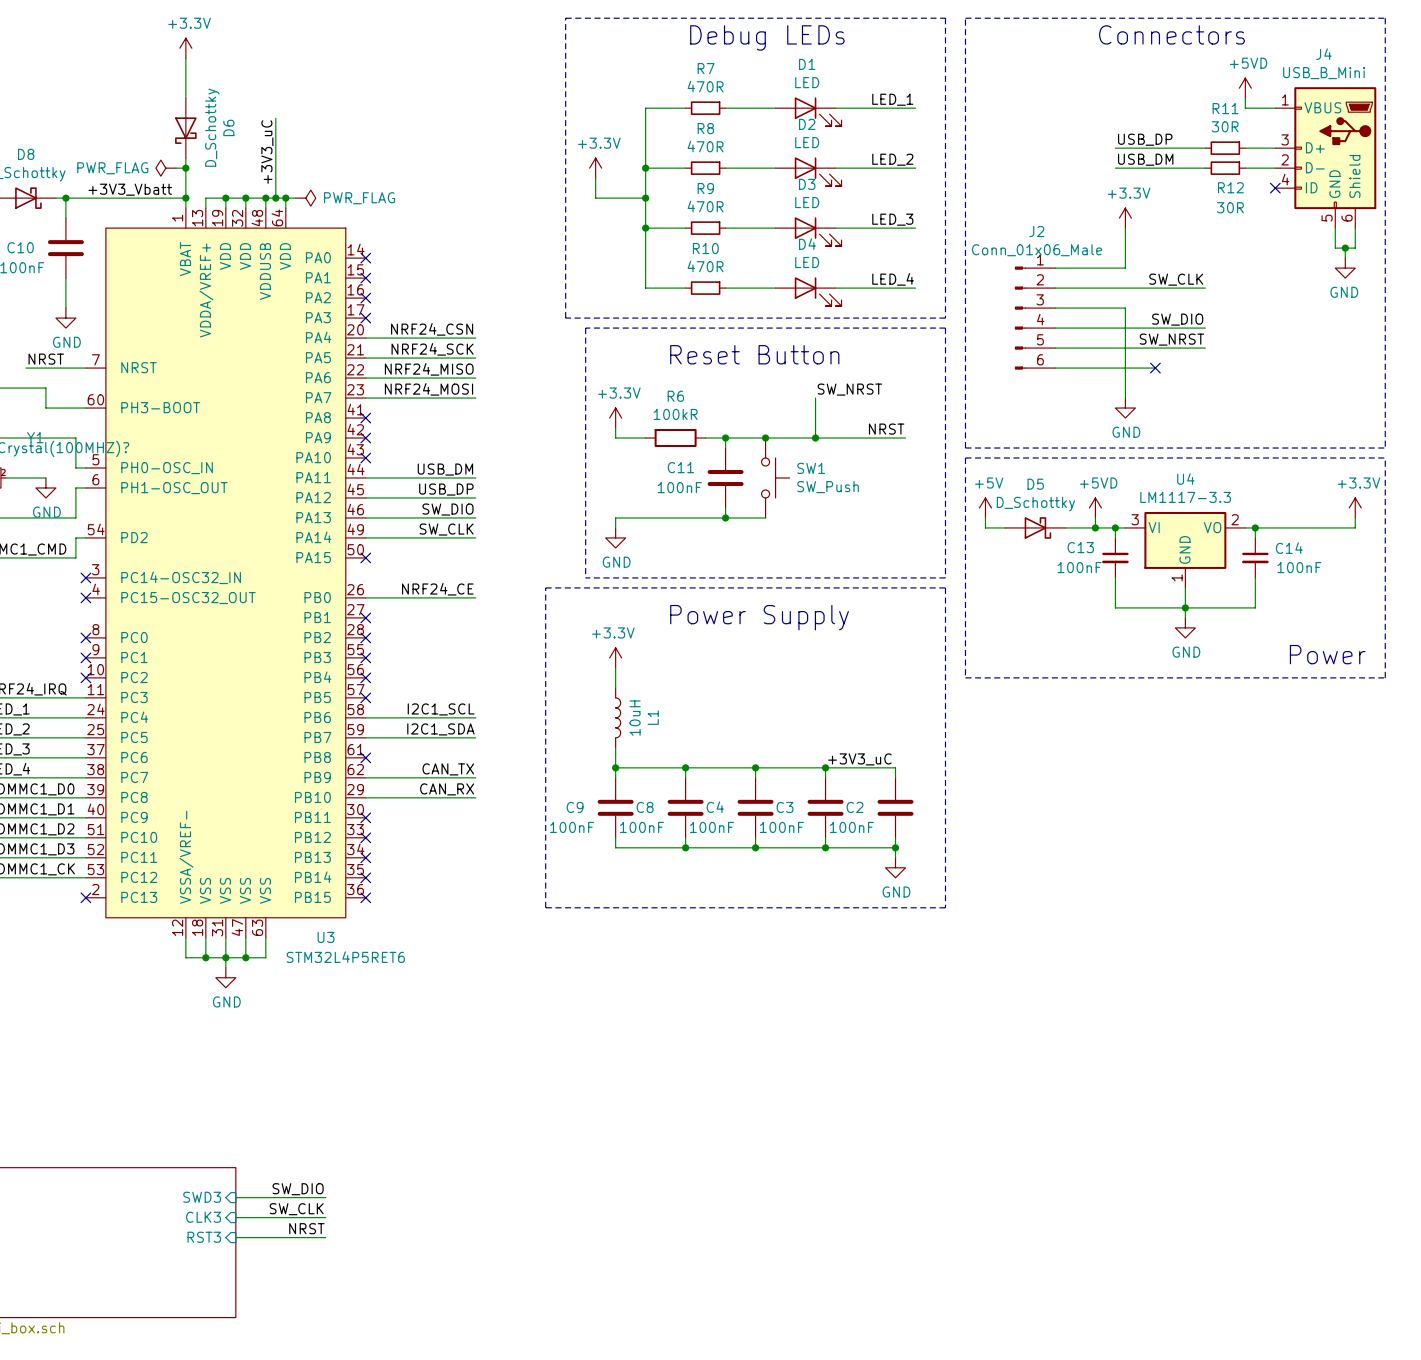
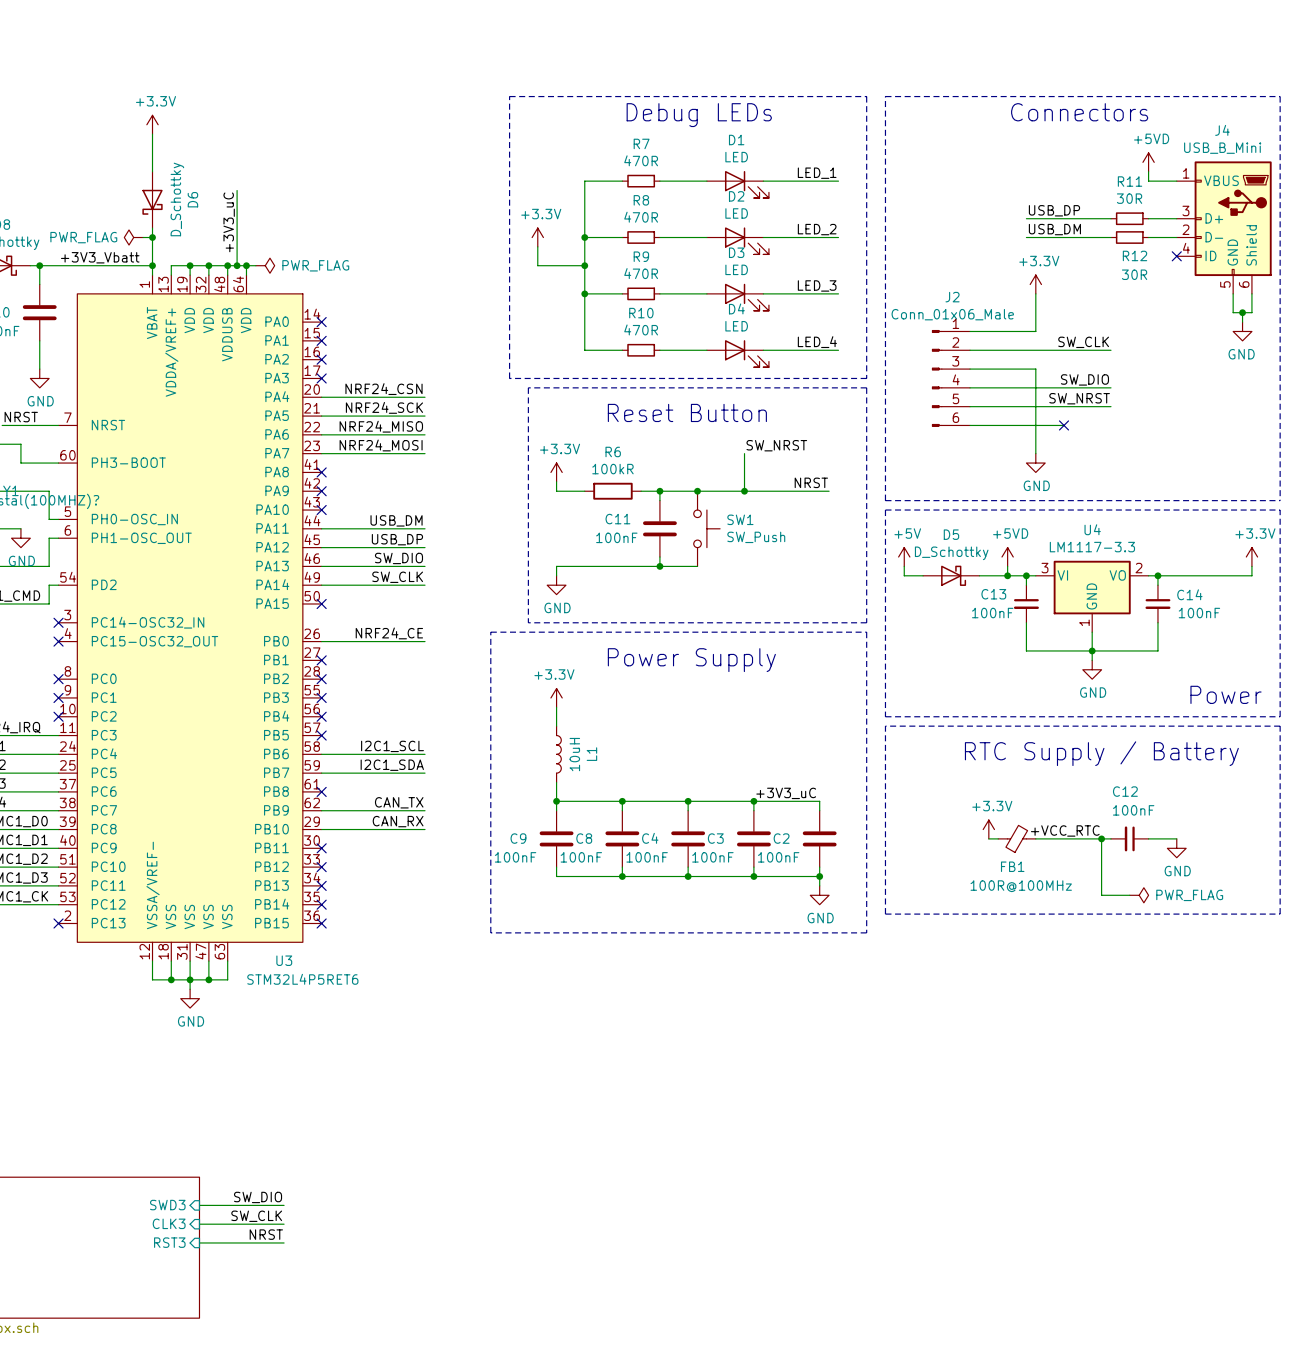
line: none -> (885, 726) (1280, 726) (1280, 914) (885, 914) (885, 726)
text: none -> RTC Supply / Battery (1101, 753)
power symbol: none -> +3.3V (988, 829)
label: none -> +VCC_RTC (1065, 830)
wire: none -> (988, 838) (998, 838)
FB1: none -> 100R@100MHz (1017, 838)
wire: none -> (1035, 838) (1110, 838)
wire: none -> (1101, 838) (1101, 895) (1129, 895)
junction: none -> (1101, 838)
C12: none -> 100nF (1129, 838)
wire: none -> (1148, 838) (1176, 838)
power symbol: none -> GND (1176, 848)
power symbol: none -> PWR_FLAG (1139, 895)

